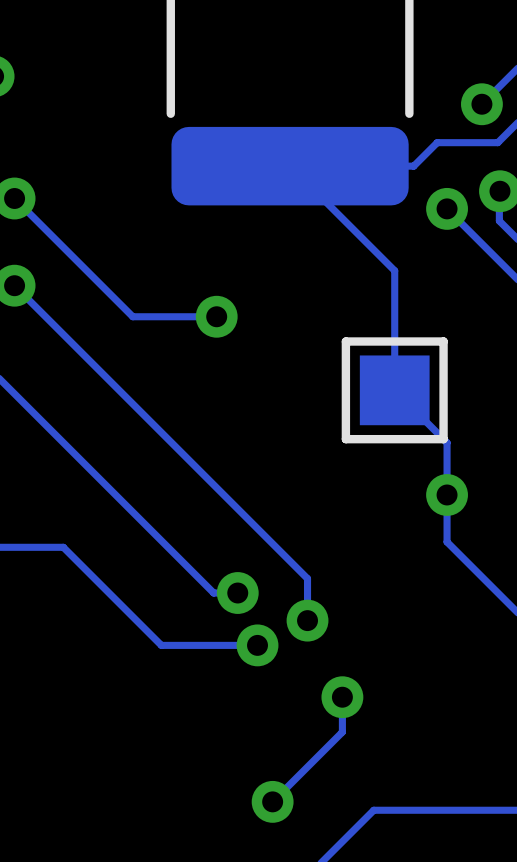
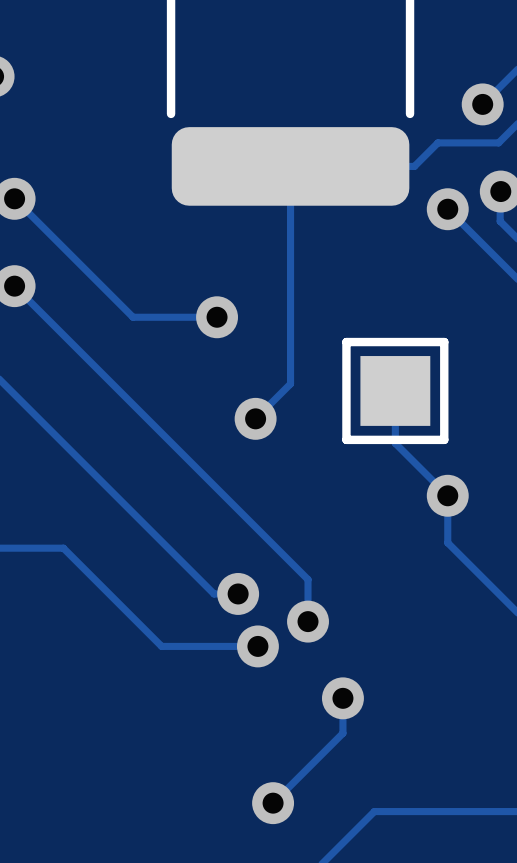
track: (290, 166) (394, 270) (394, 390) (447, 442) (447, 494) -> (290, 166) (290, 383) (255, 418)
track: none -> (395, 390) (395, 443) (447, 495)
via: none -> (255, 418)

